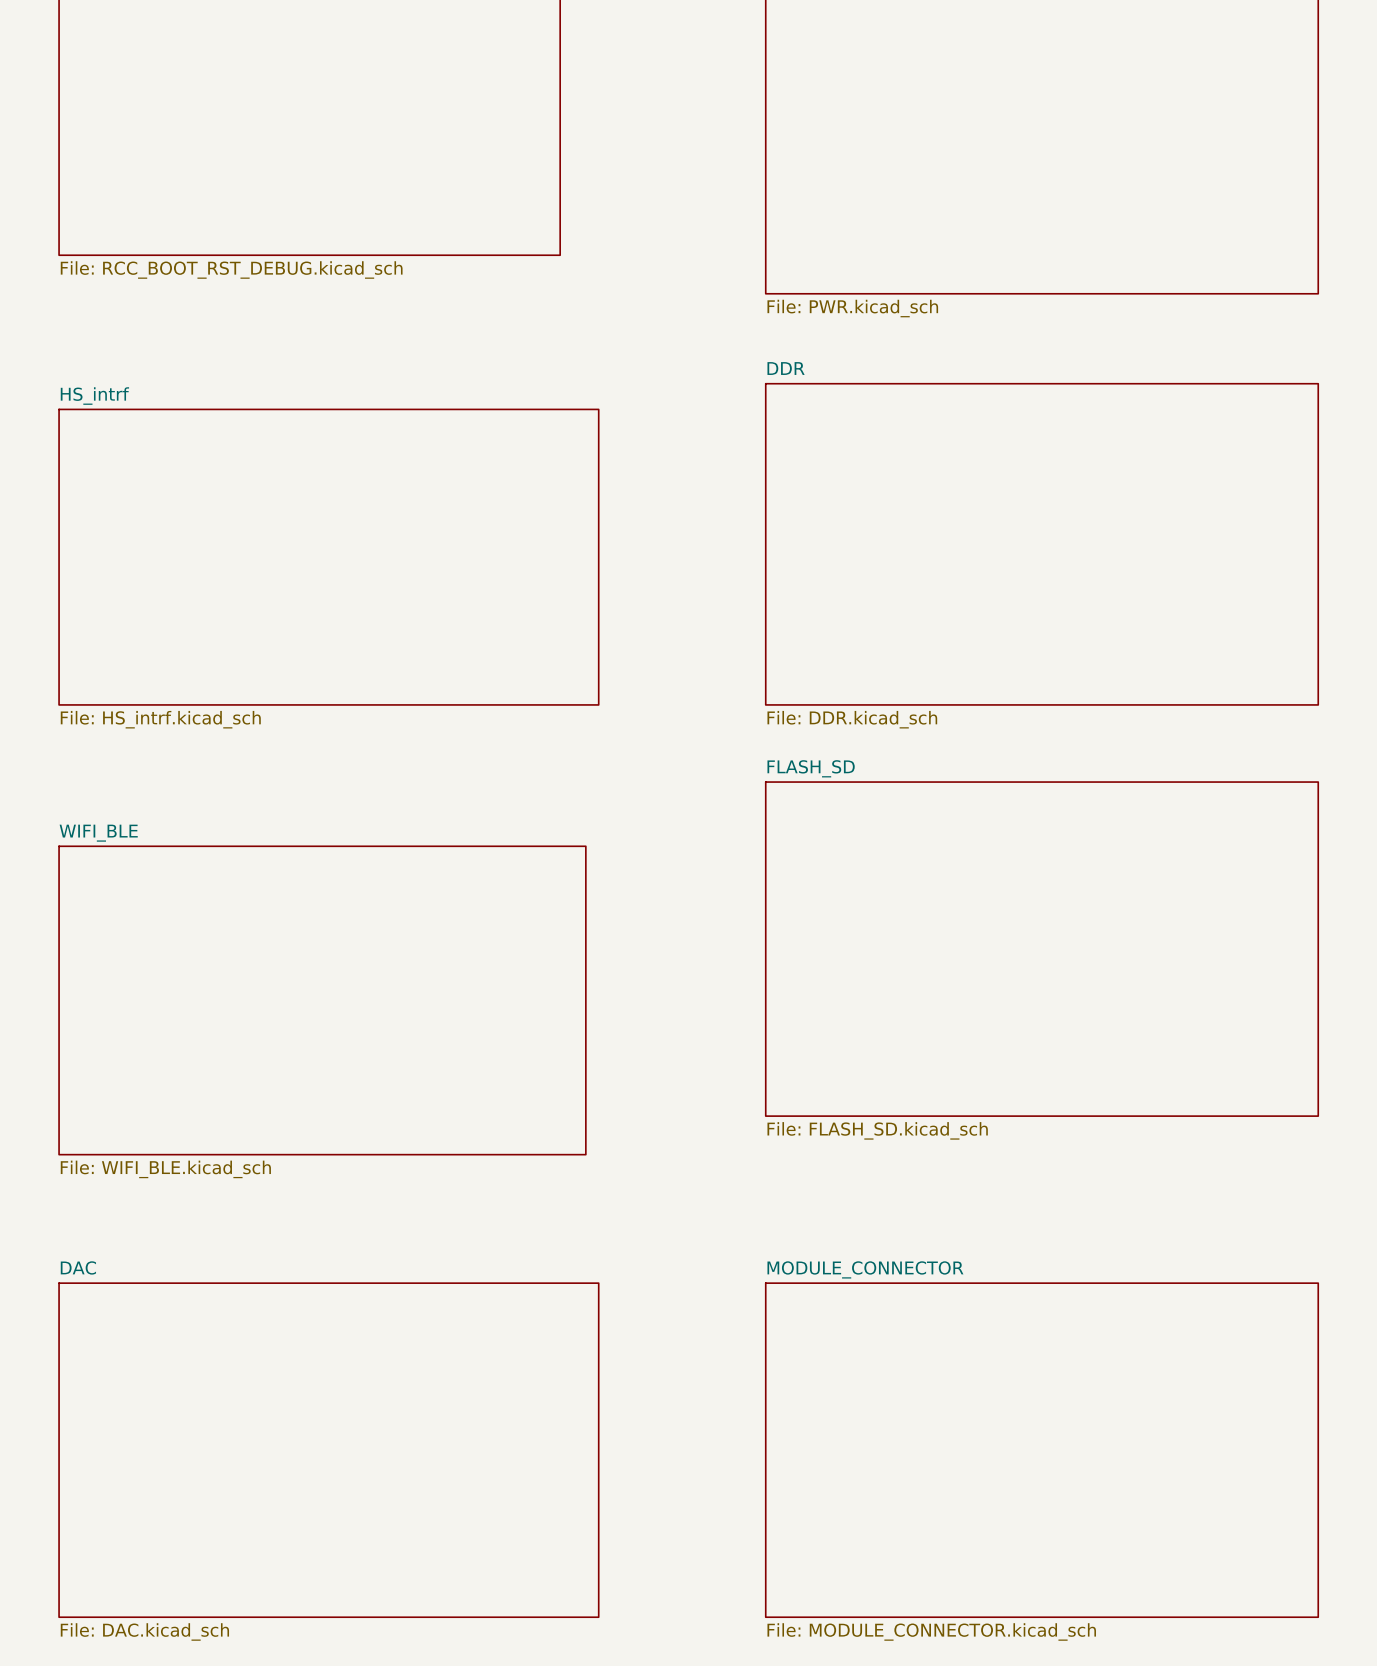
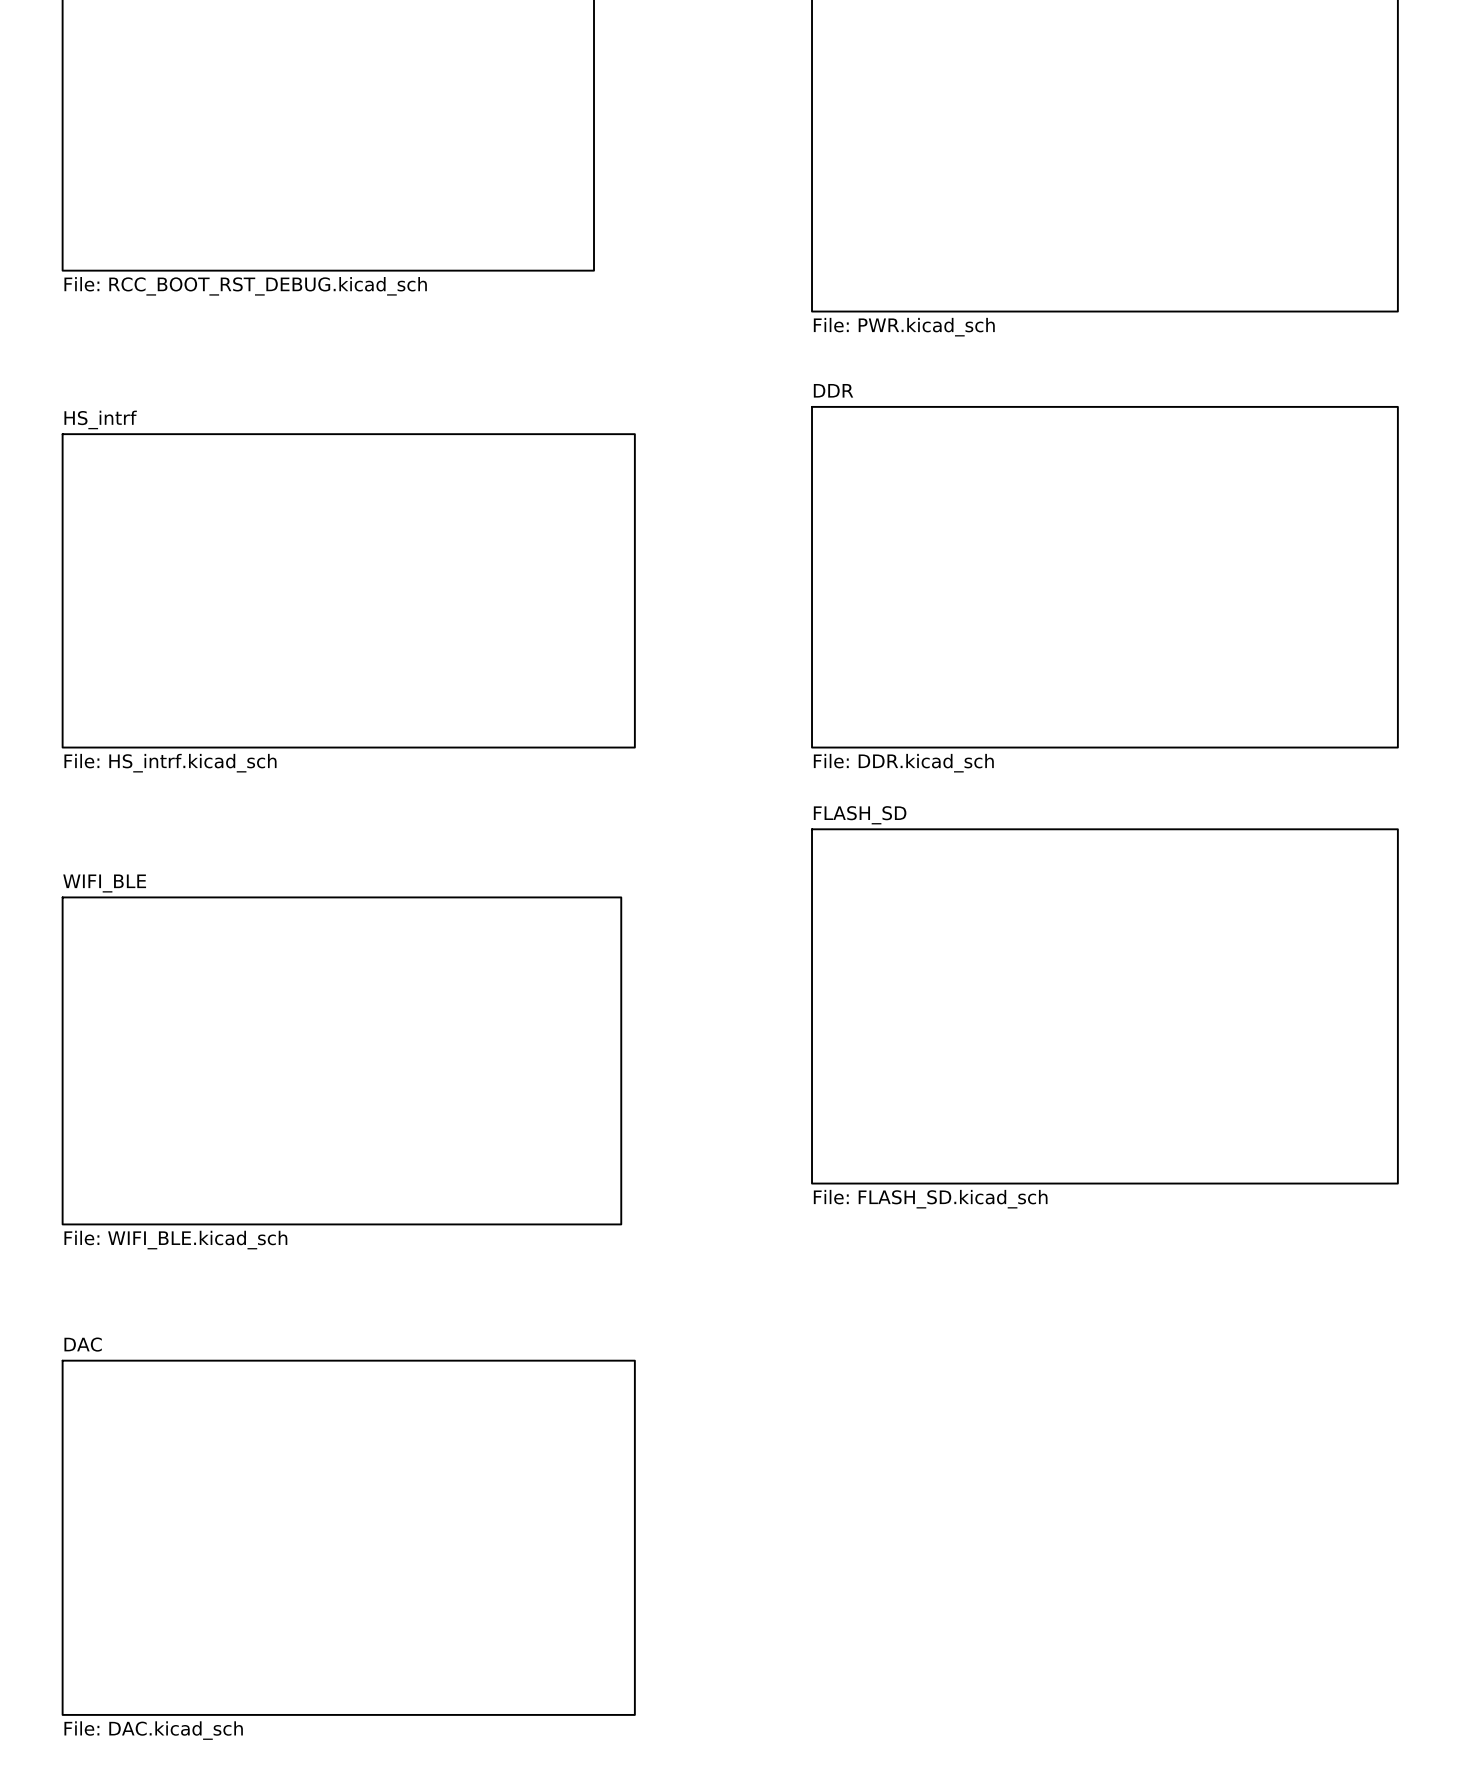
sheet MODULE_CONNECTOR: File: MODULE_CONNECTOR.kicad_sch (1041, 1450) -> none

